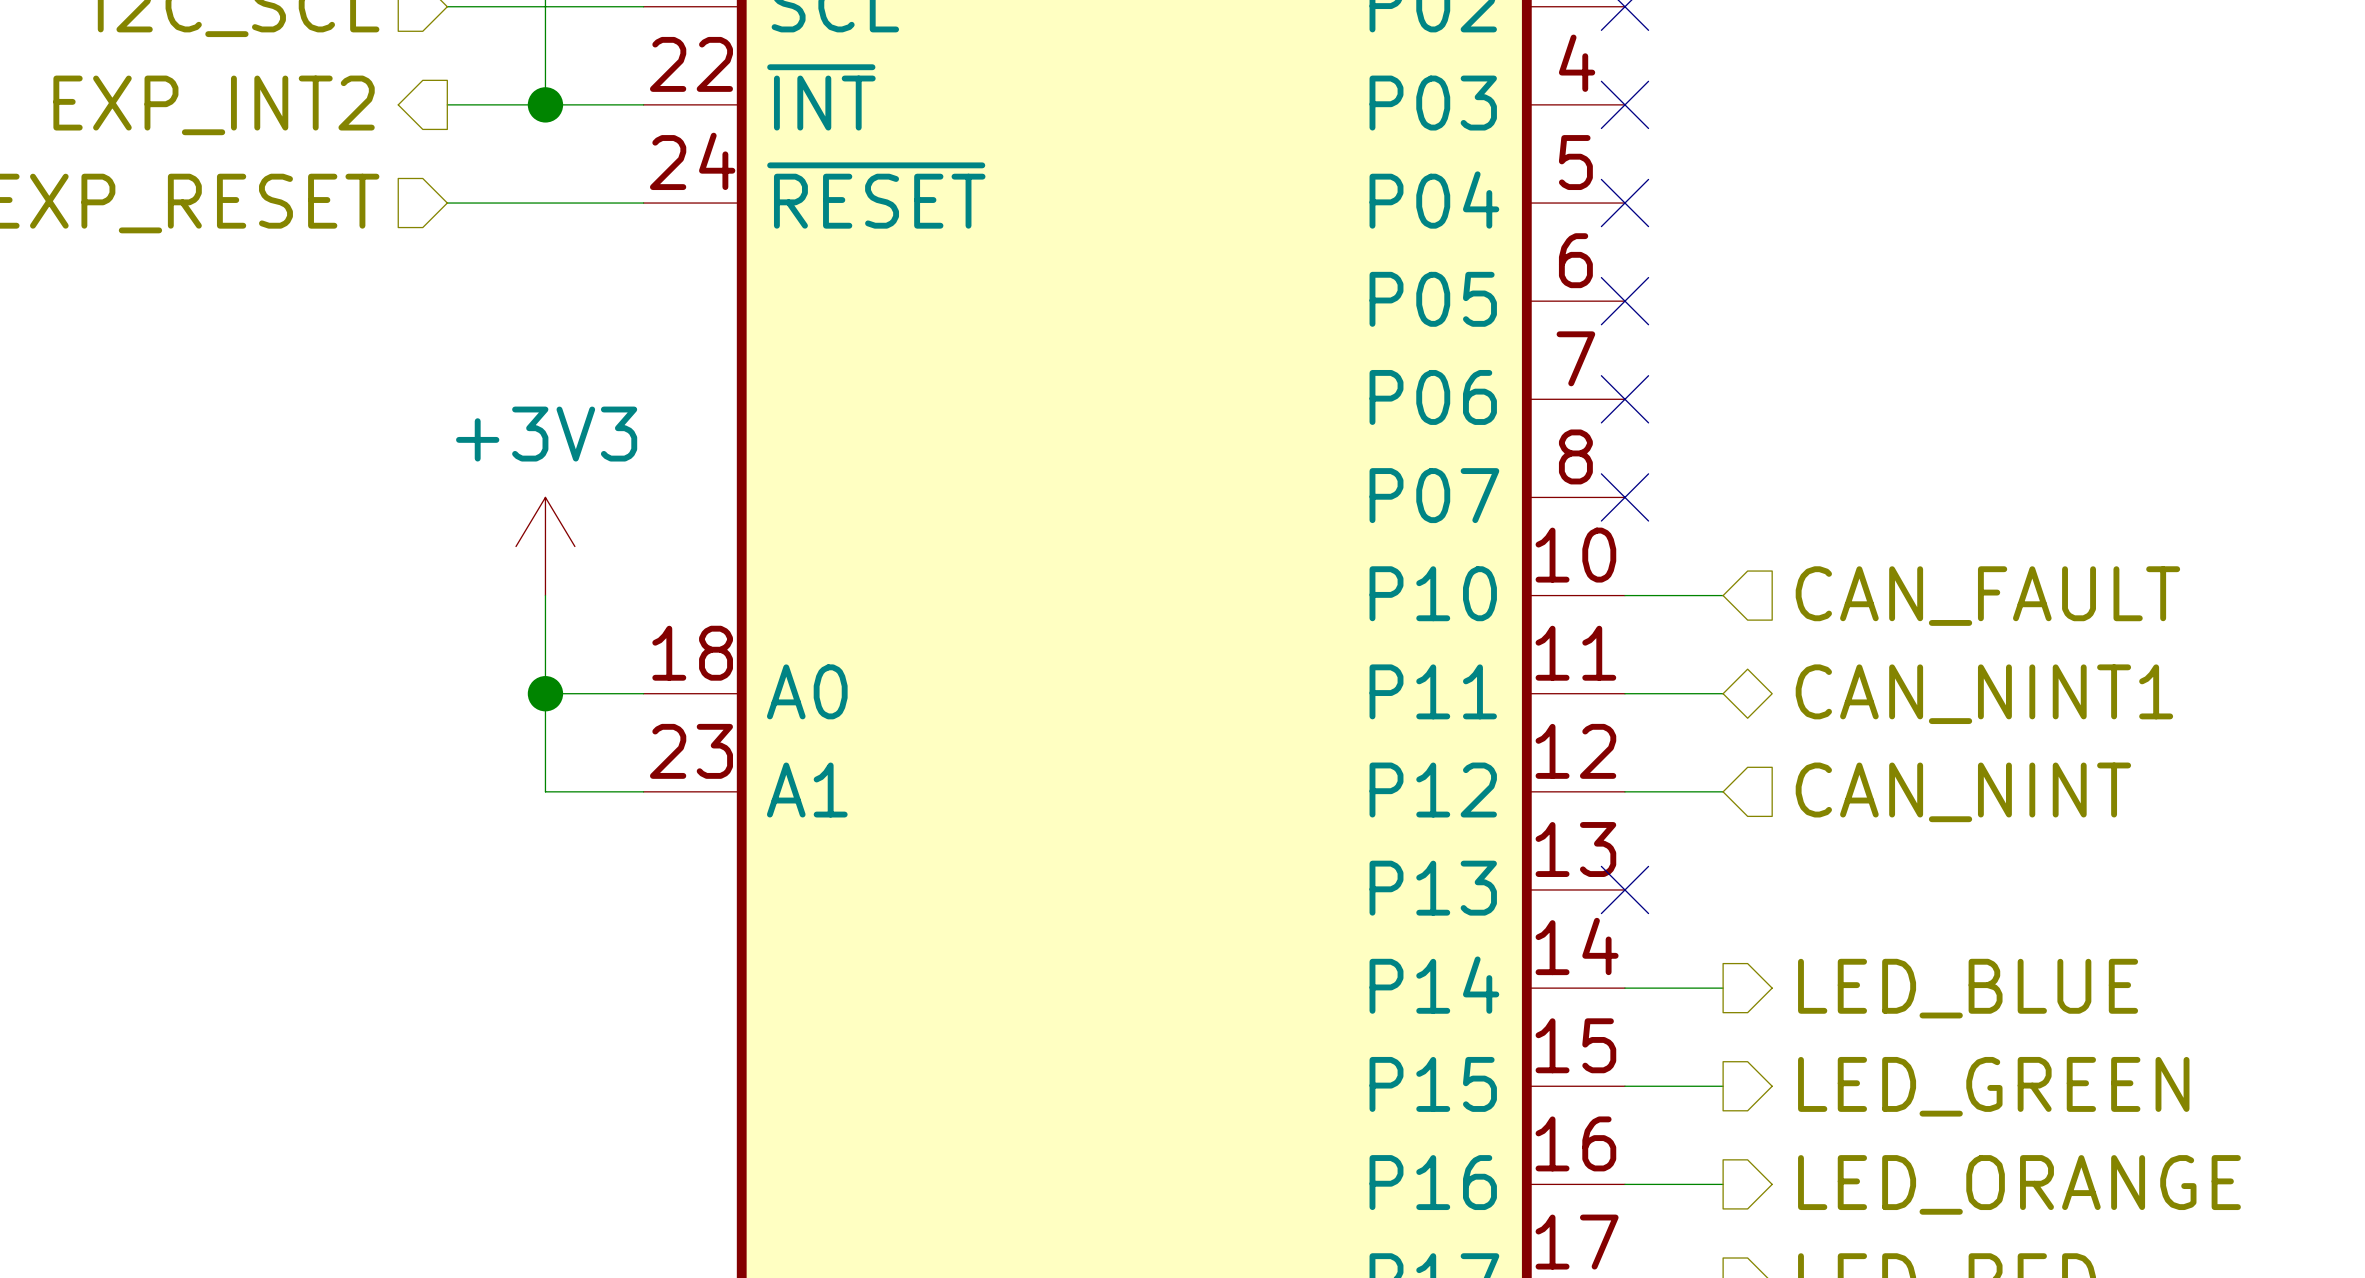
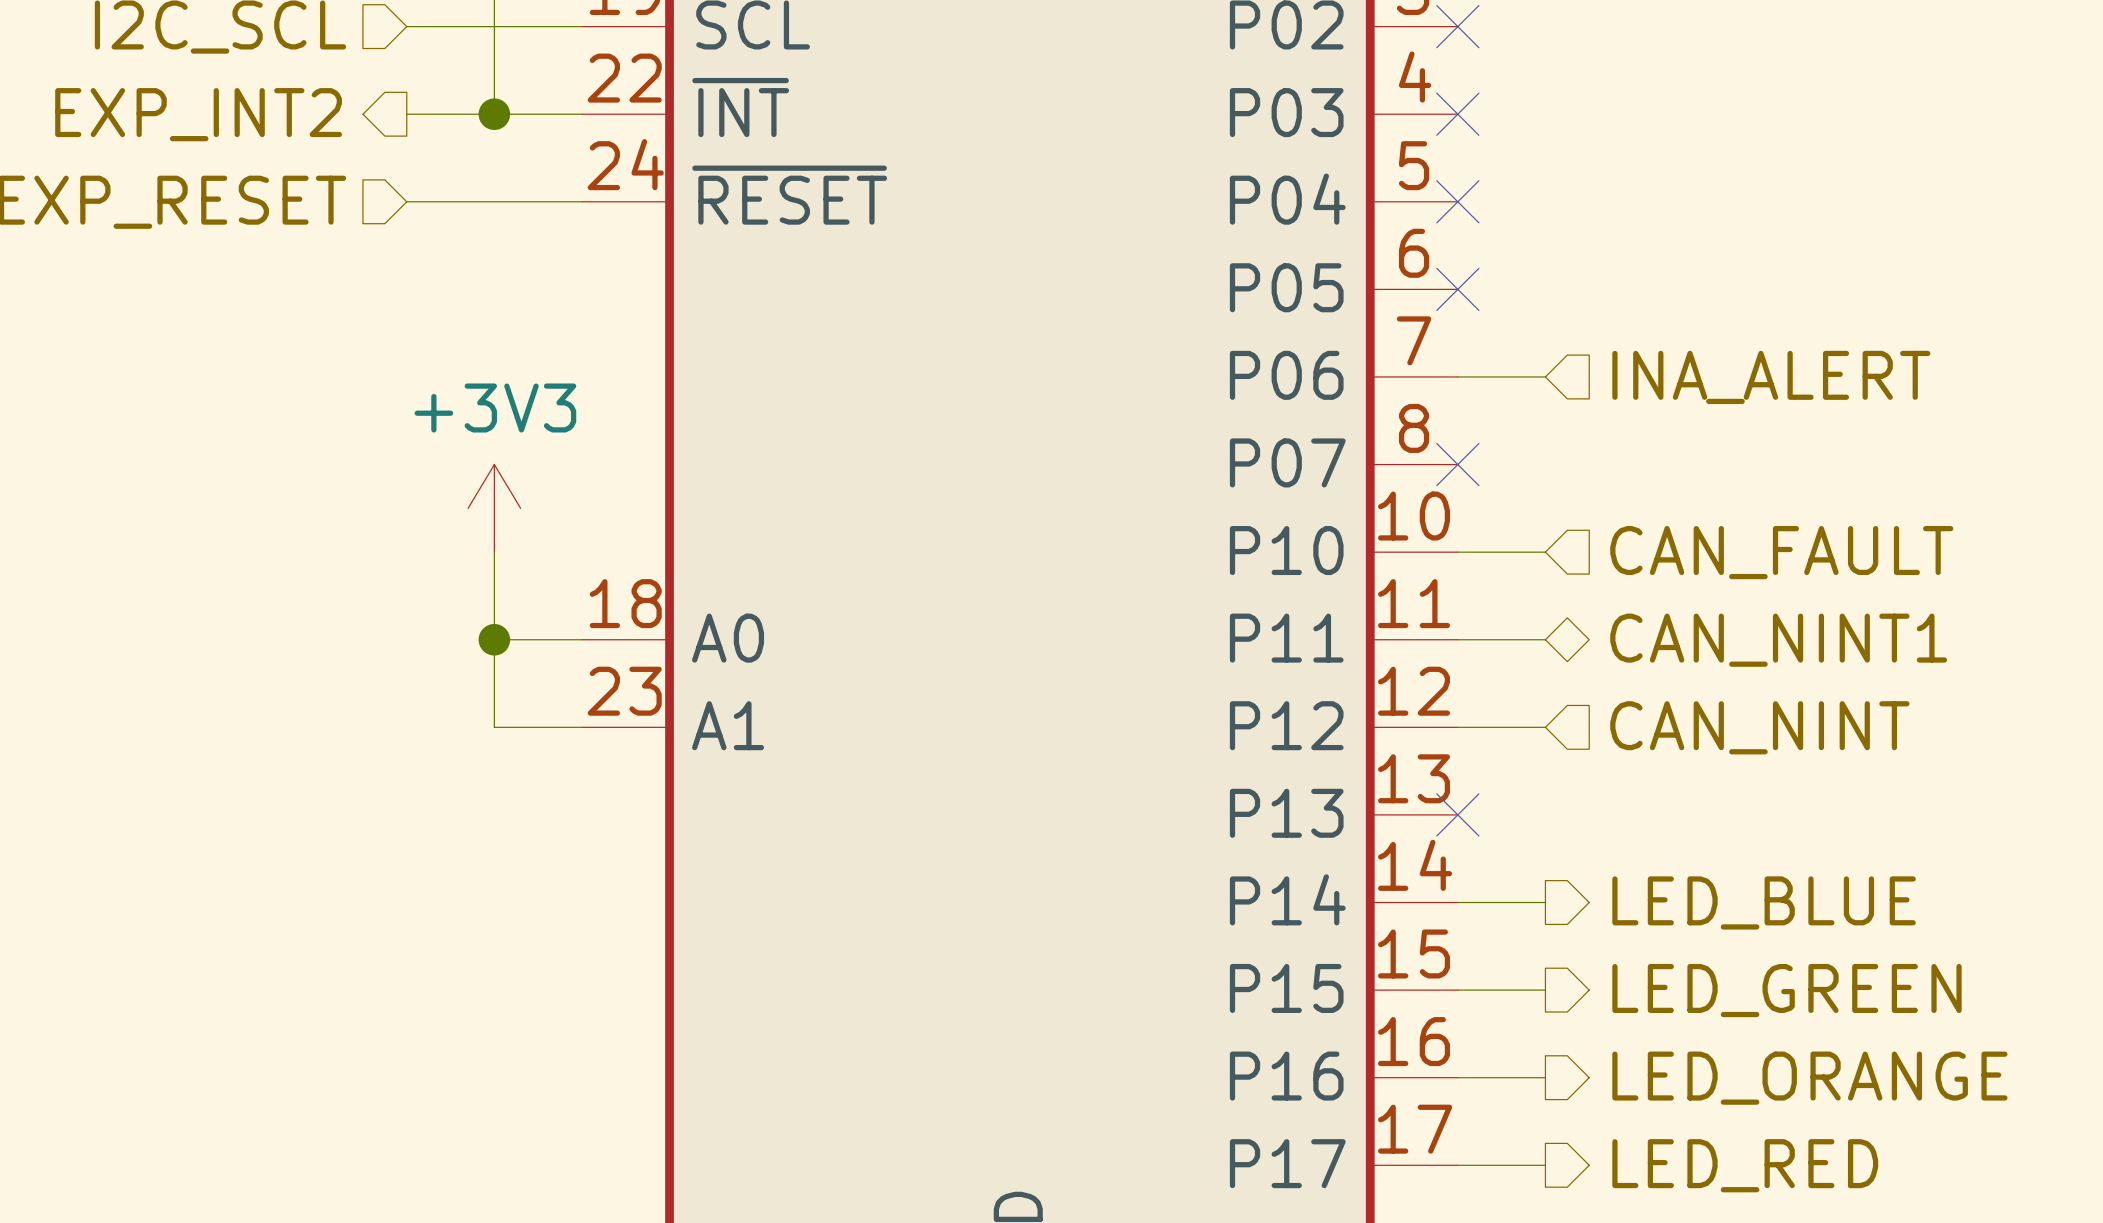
wire: none -> (1457, 376) (1545, 376)
no-connect mark: (1624, 399) -> none
hierarchical label: none -> INA_ALERT (1771, 377)

